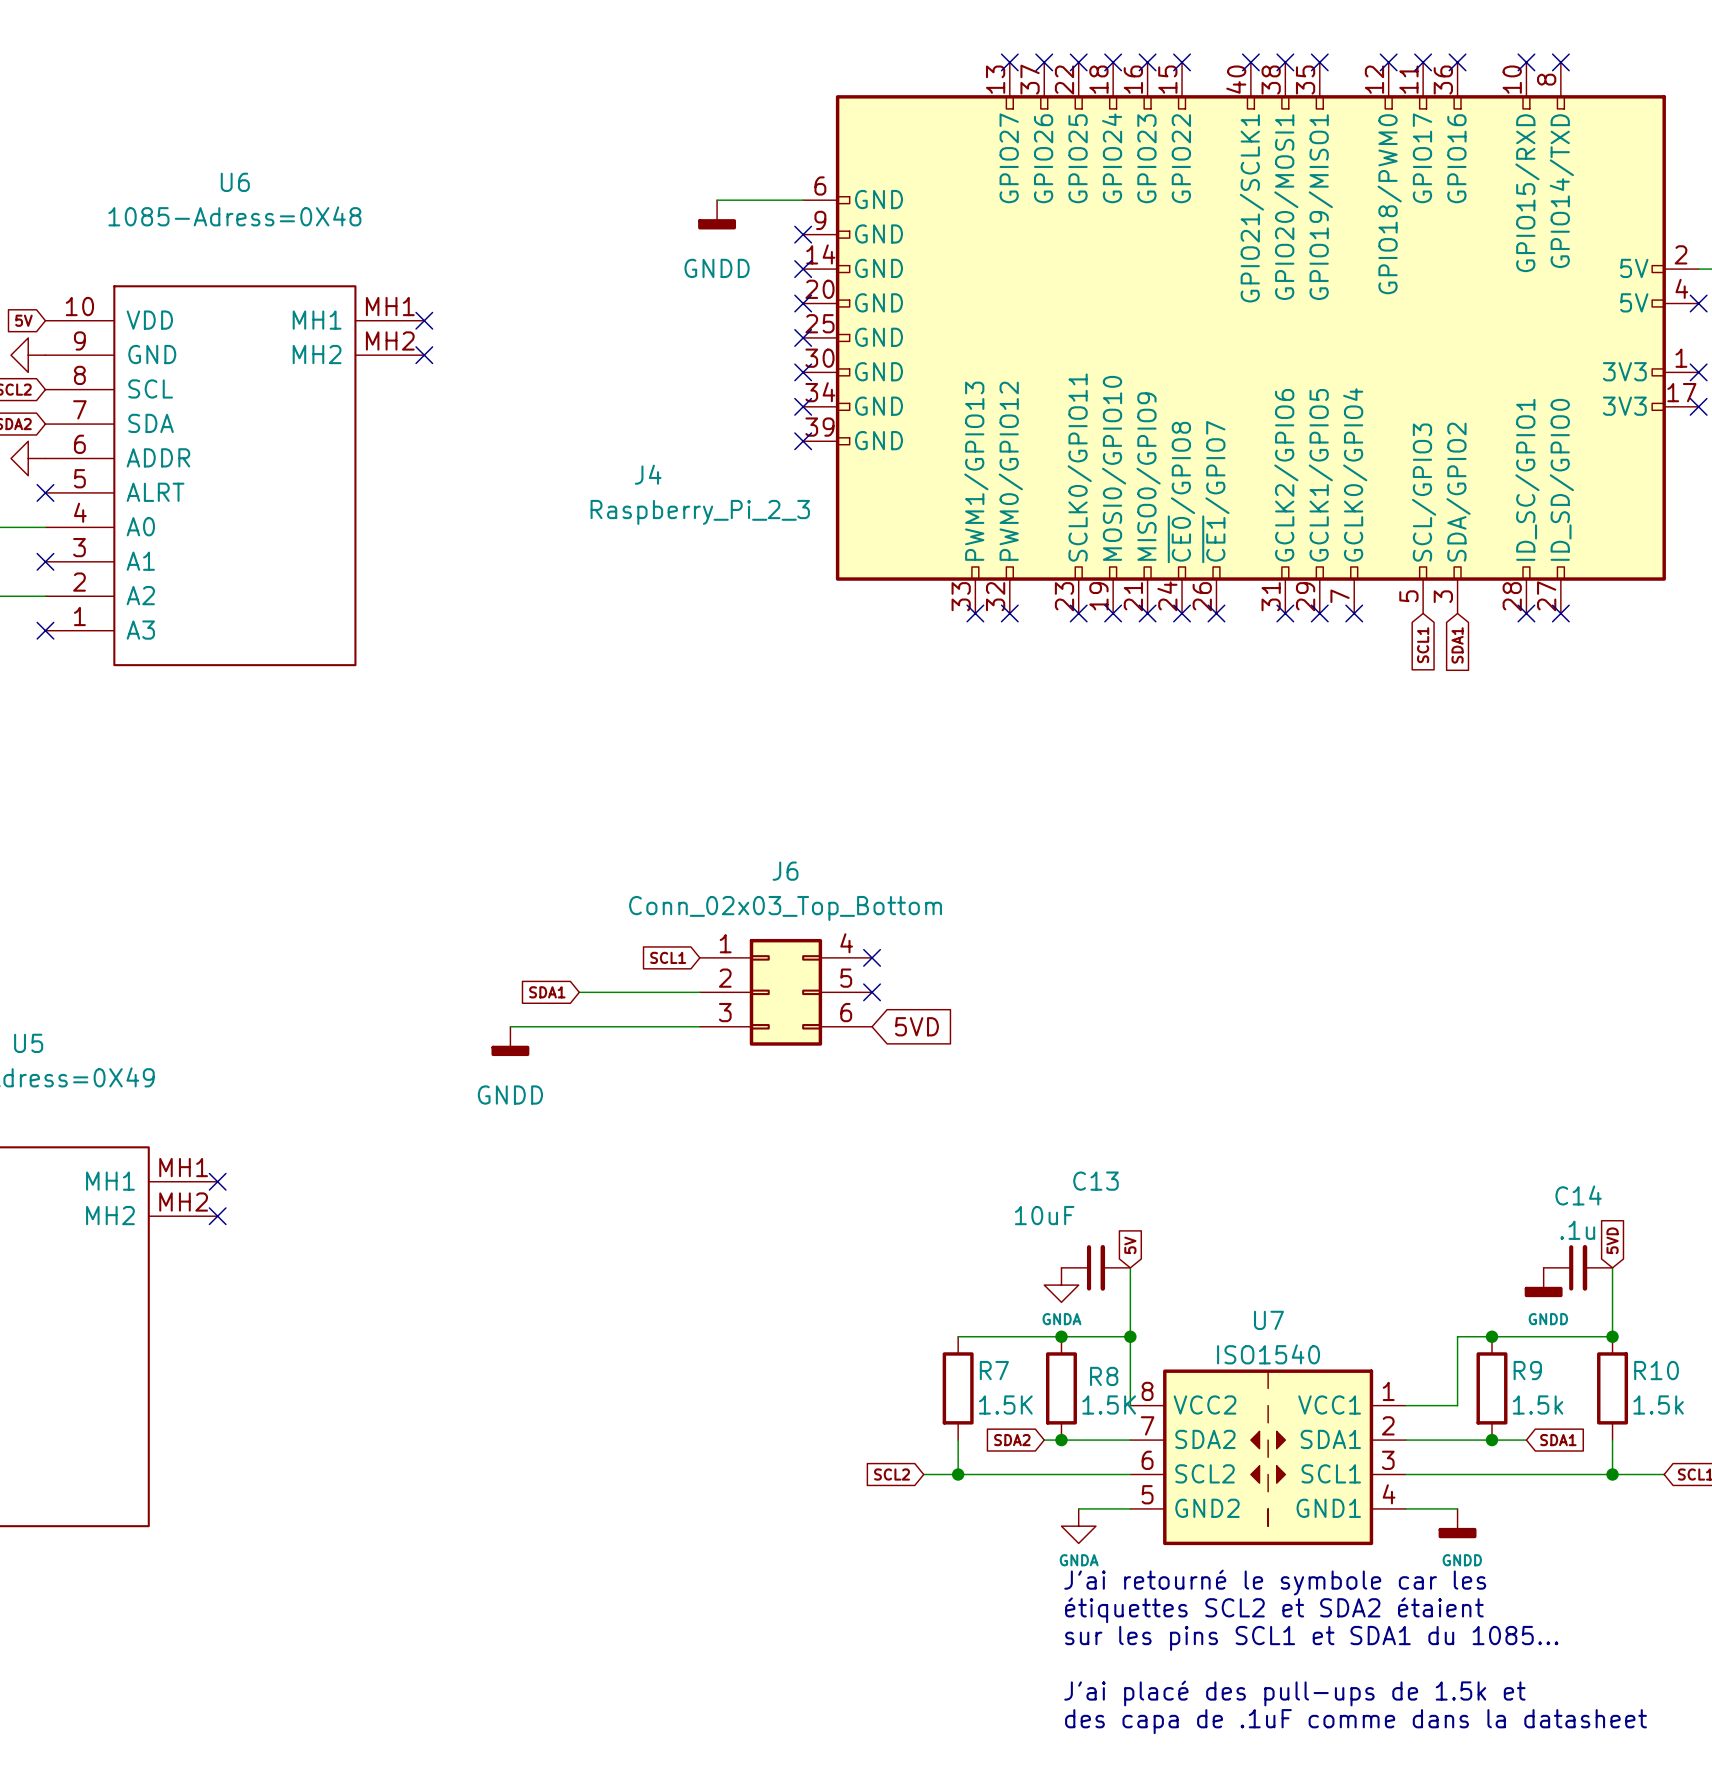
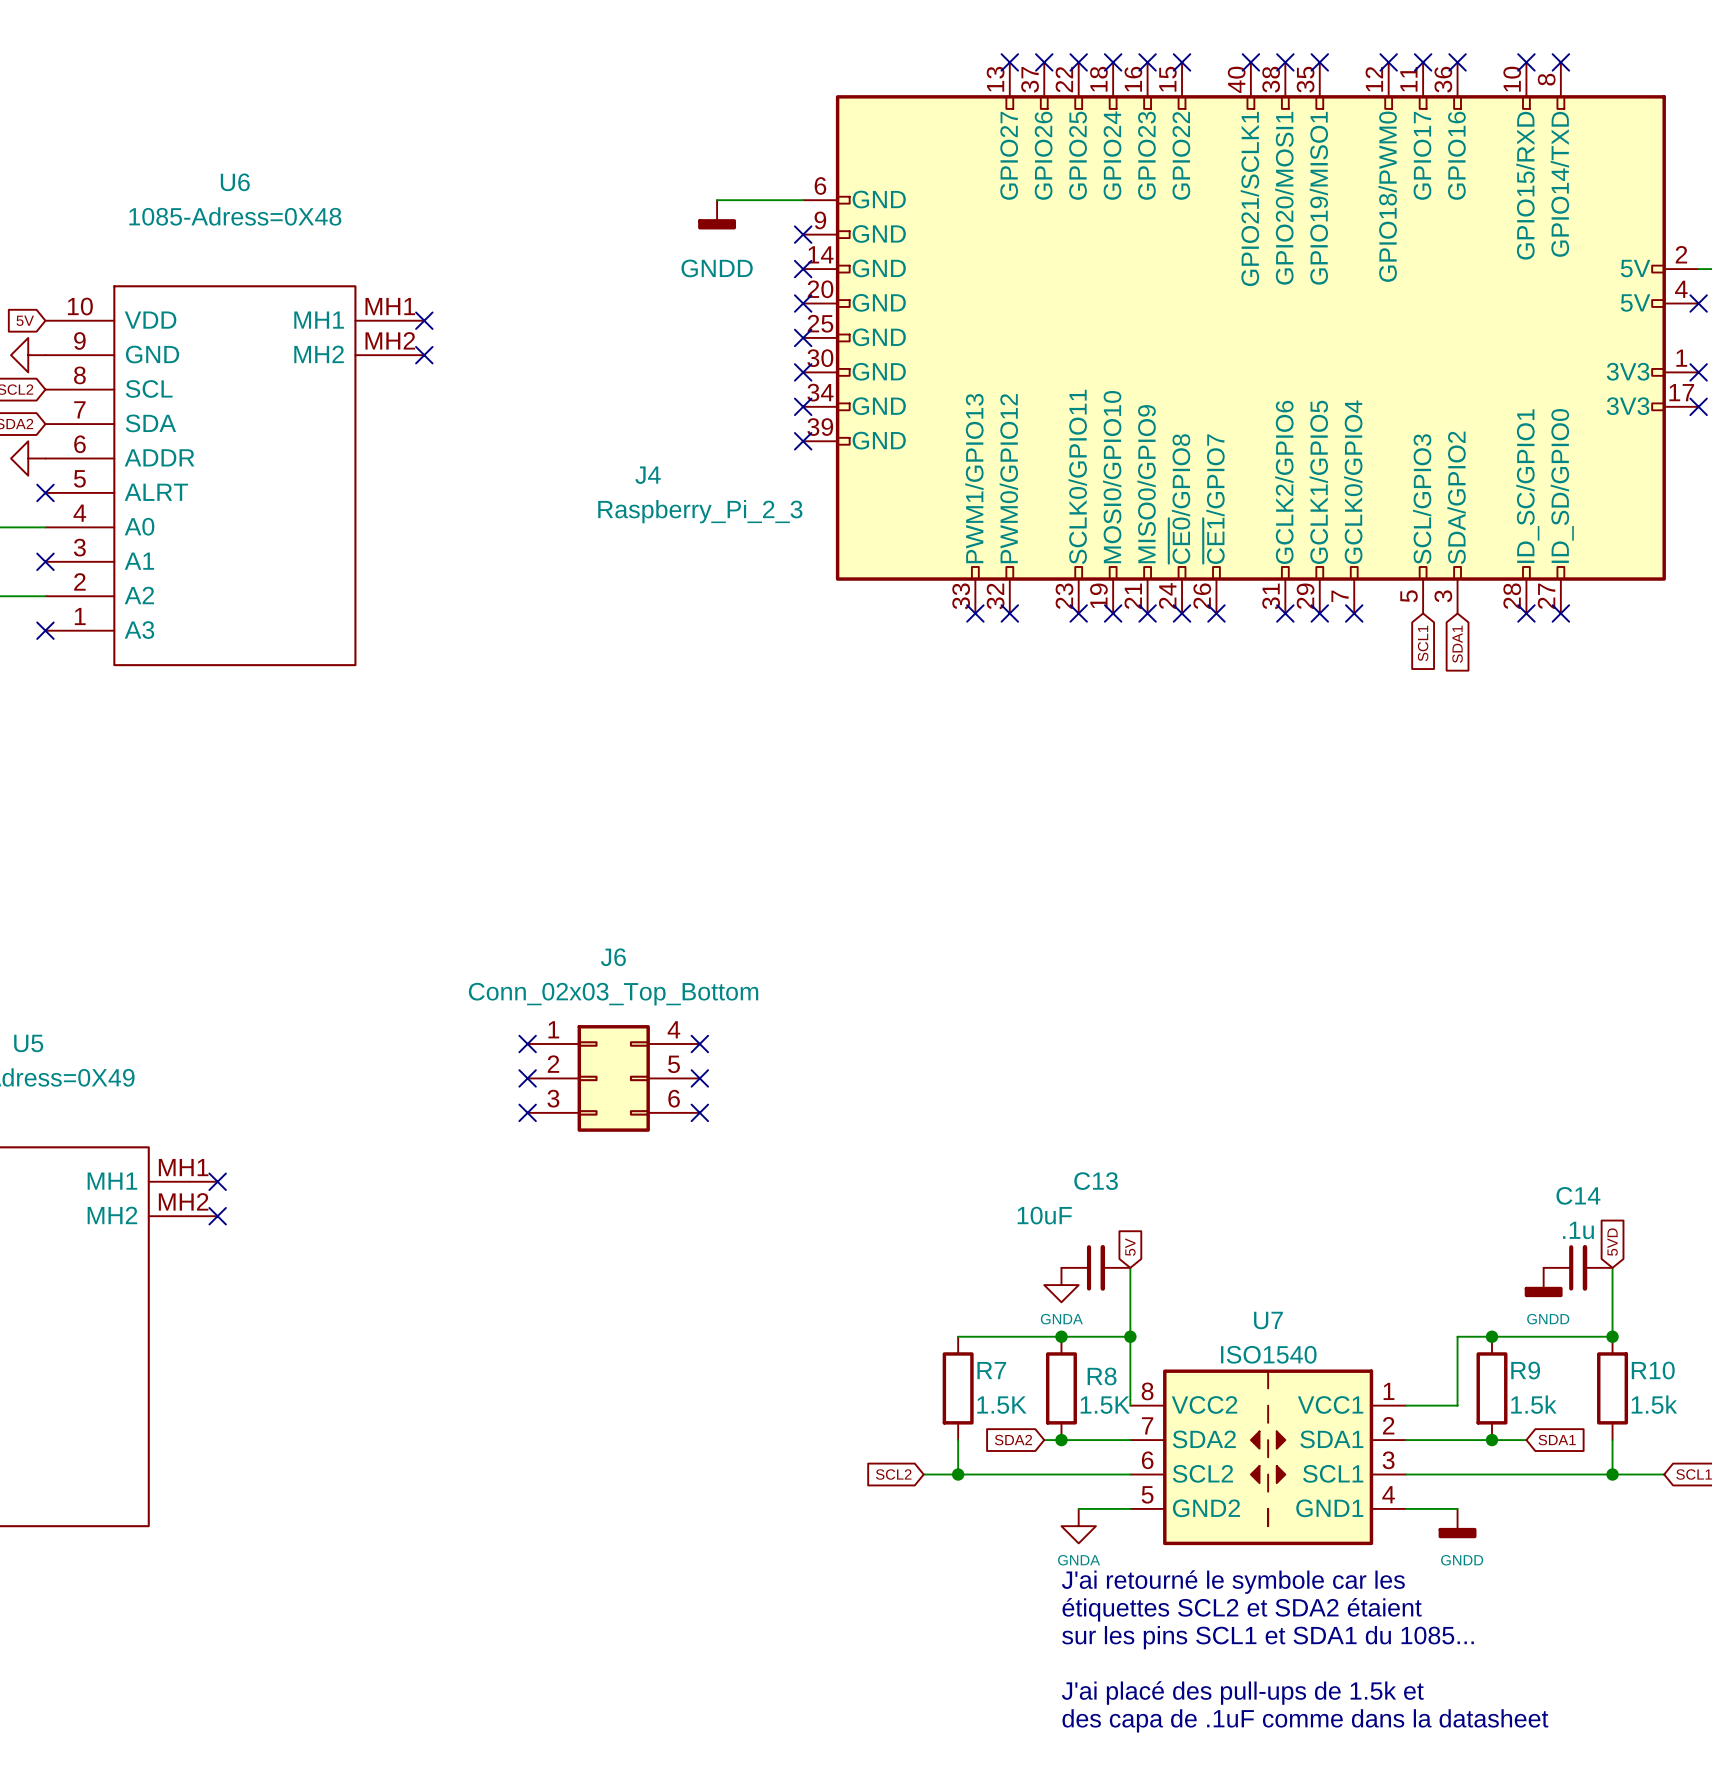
global label: SCL1 (668, 957) -> none
no-connect mark: (872, 957) -> none
global label: SDA1 (547, 992) -> none
wire: (579, 992) (699, 992) -> none
J6 position: (785, 992) -> (613, 1078)
no-connect mark: (872, 992) -> none
wire: (510, 1026) (699, 1026) -> none
global label: 5VD (916, 1026) -> none
power symbol: GNDD (510, 1041) -> none
no-connect mark: none -> (527, 1044)
no-connect mark: none -> (699, 1044)
no-connect mark: none -> (527, 1078)
no-connect mark: none -> (699, 1078)
no-connect mark: none -> (527, 1112)
no-connect mark: none -> (699, 1112)

